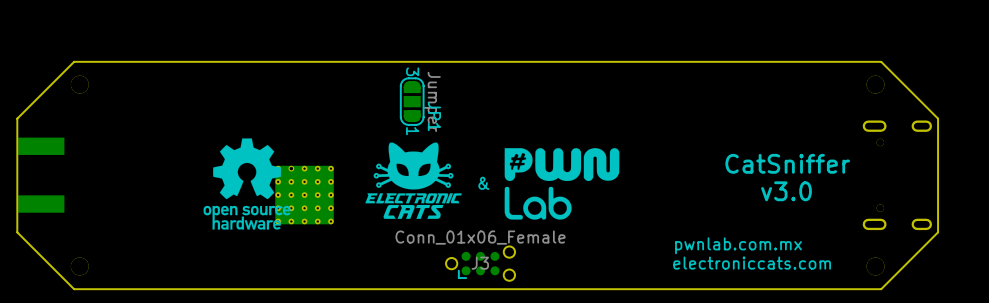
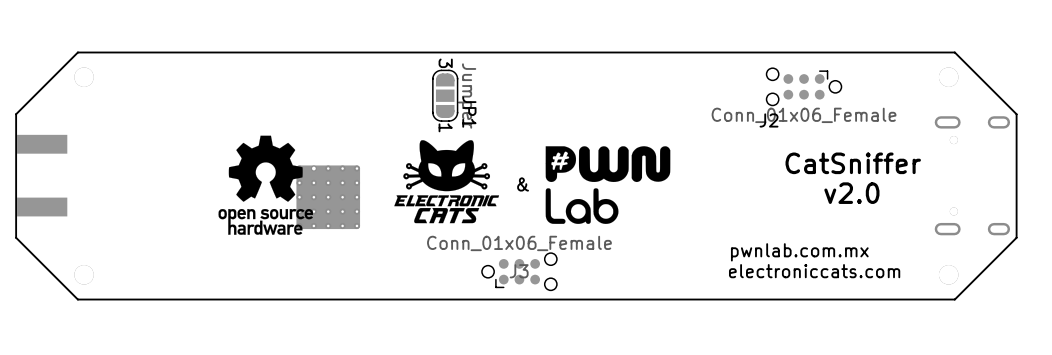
J2: none -> Conn_01x06_Female (804, 86)
text: v3.0 (786, 191) -> v2.0 (851, 193)

